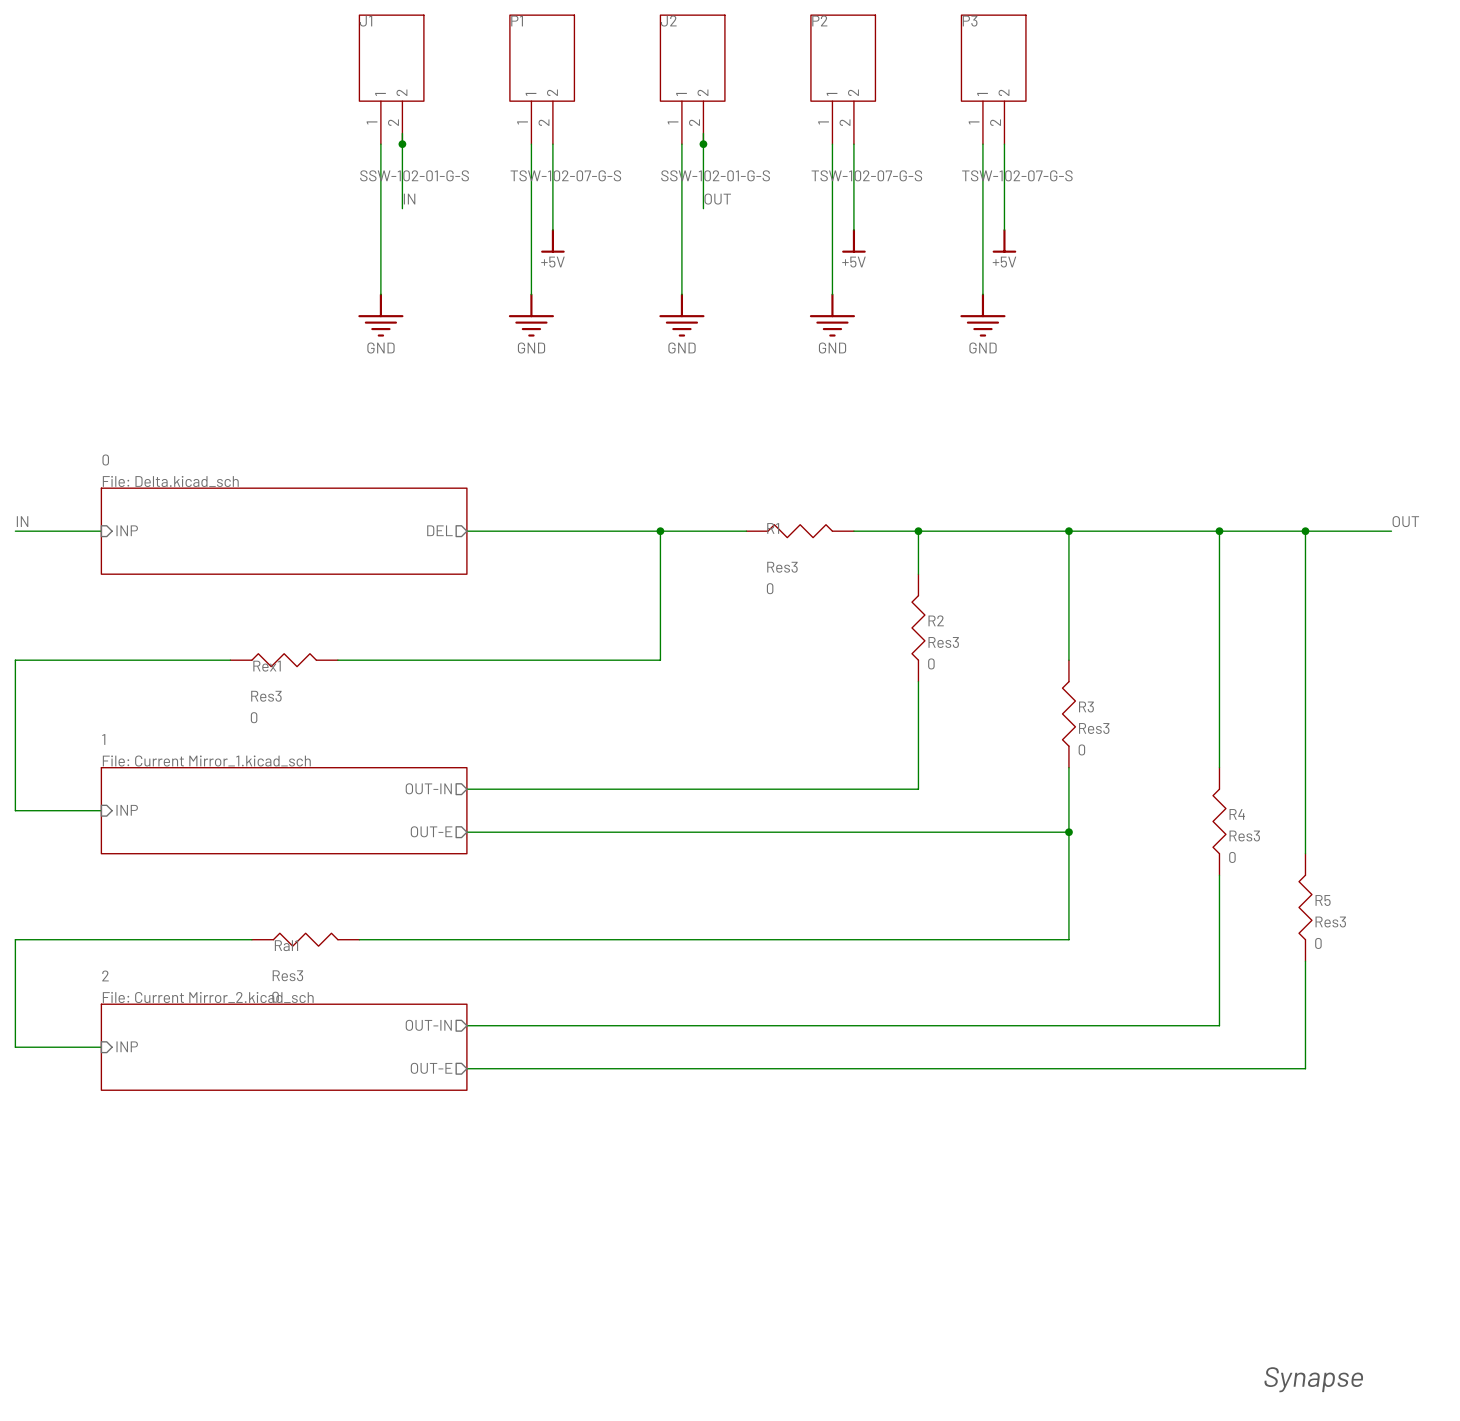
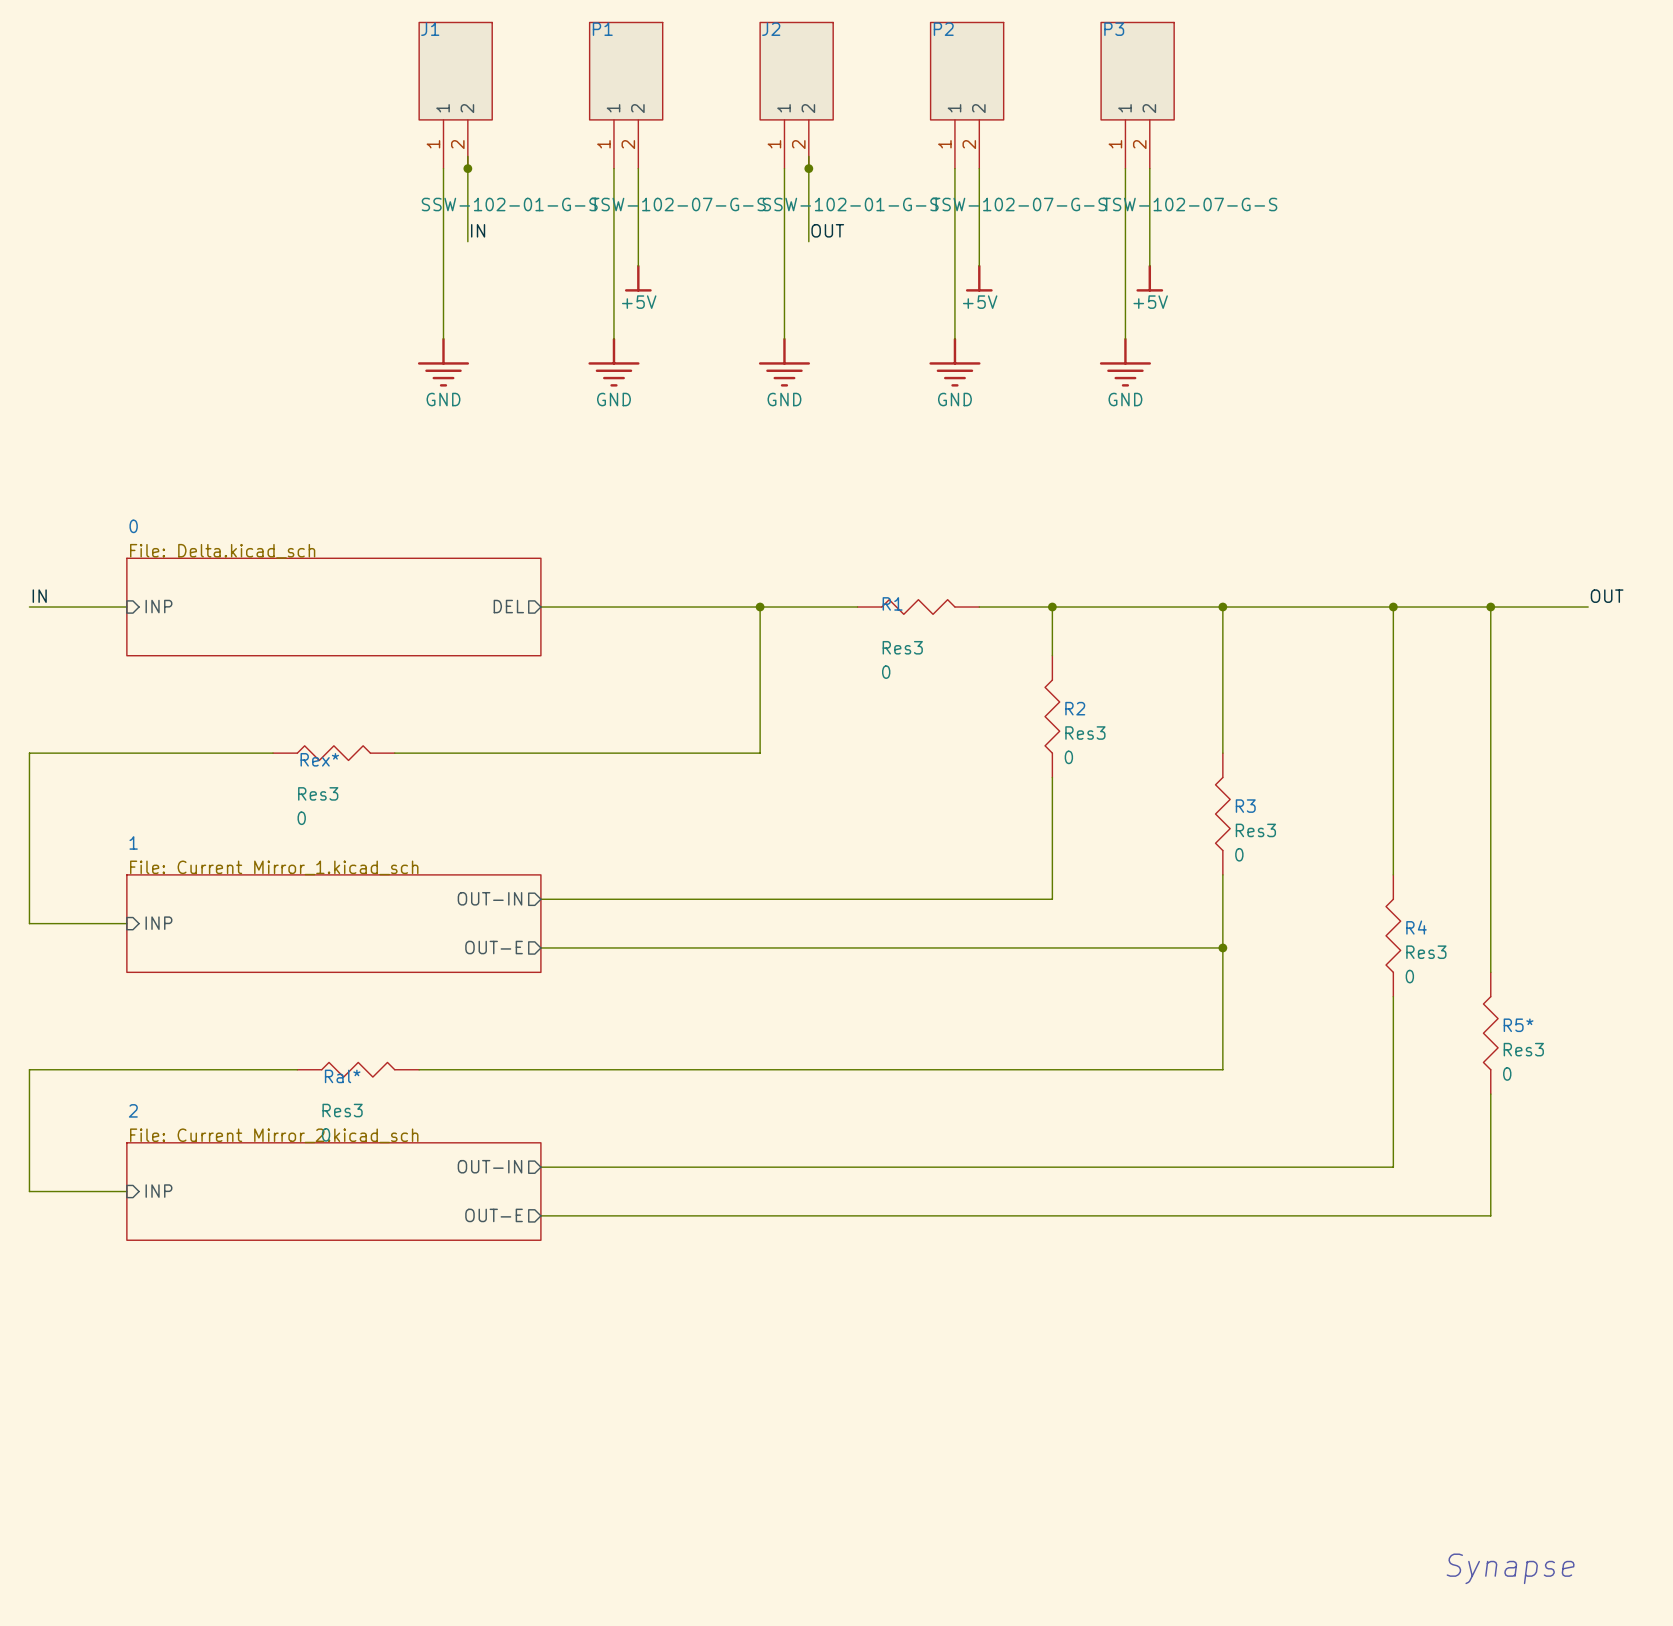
Rex1 name: Rex1 (267, 666) -> Rex* (319, 759)
R5 name: R5 (1323, 900) -> R5* (1518, 1025)
Ral1 name: Ral1 (286, 945) -> Ral* (342, 1076)

